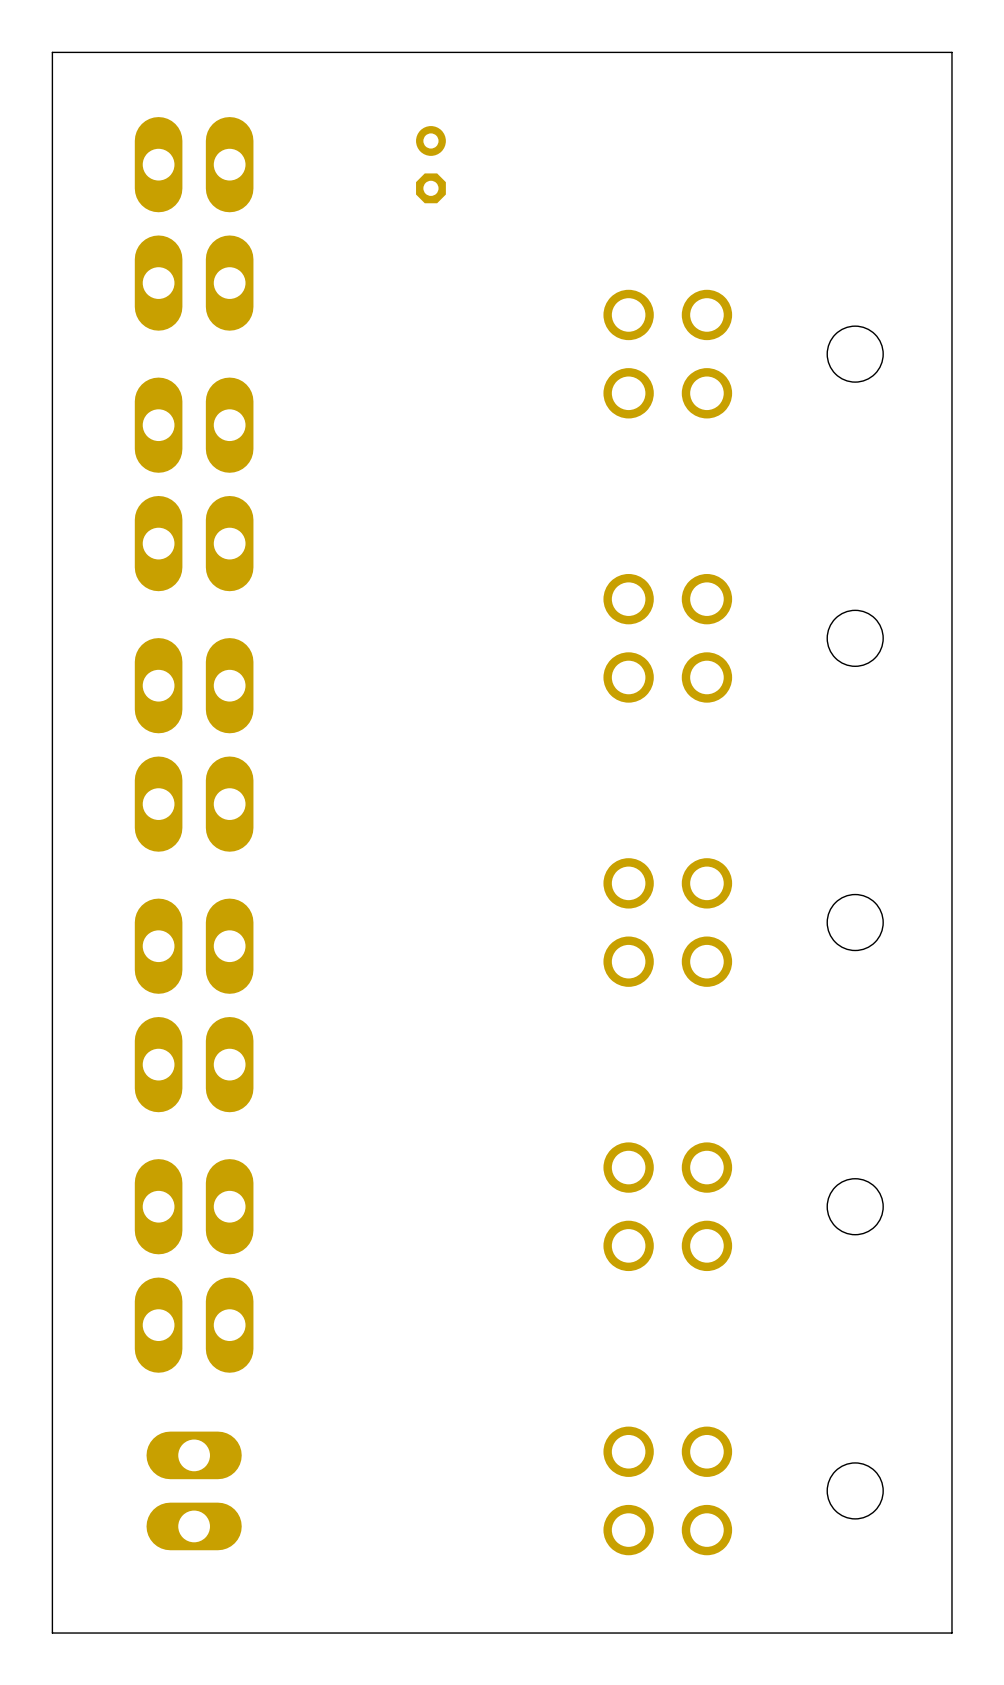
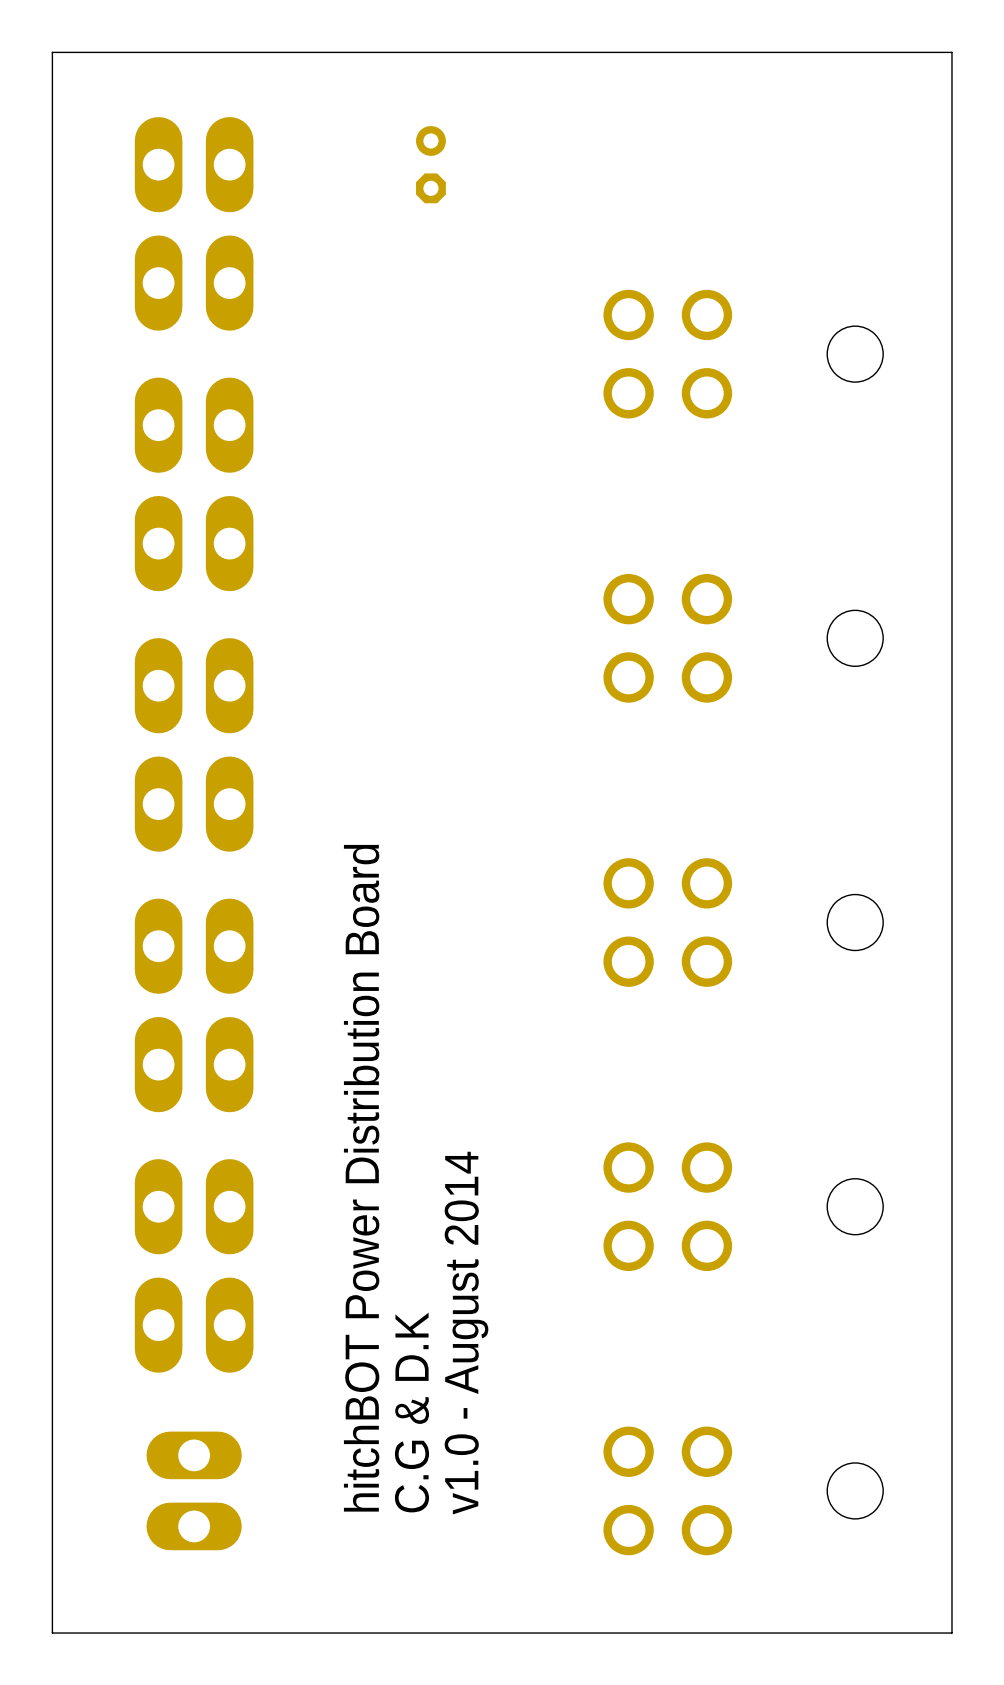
text: none -> hitchBOT Power Distribution Board (361, 1178)
text: none -> v1.0 - August 2014 (466, 1333)
text: none -> C.G & D.K (412, 1412)

